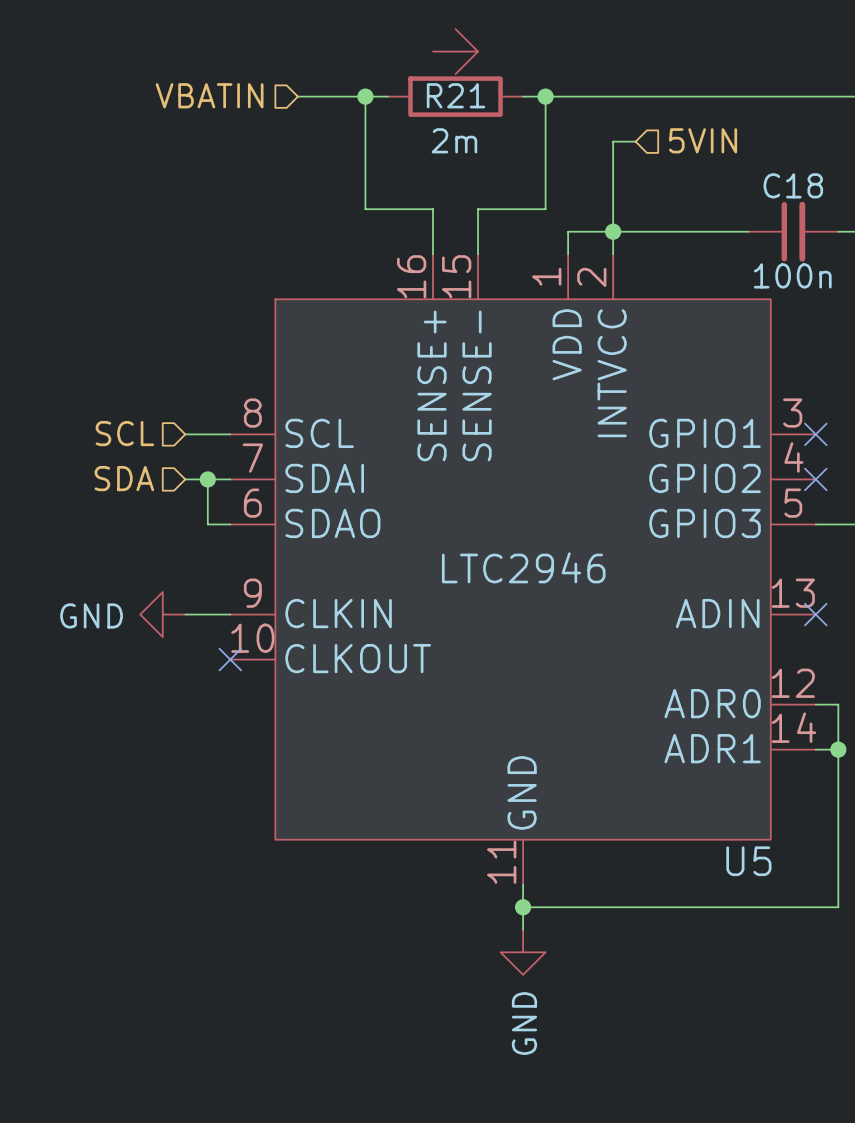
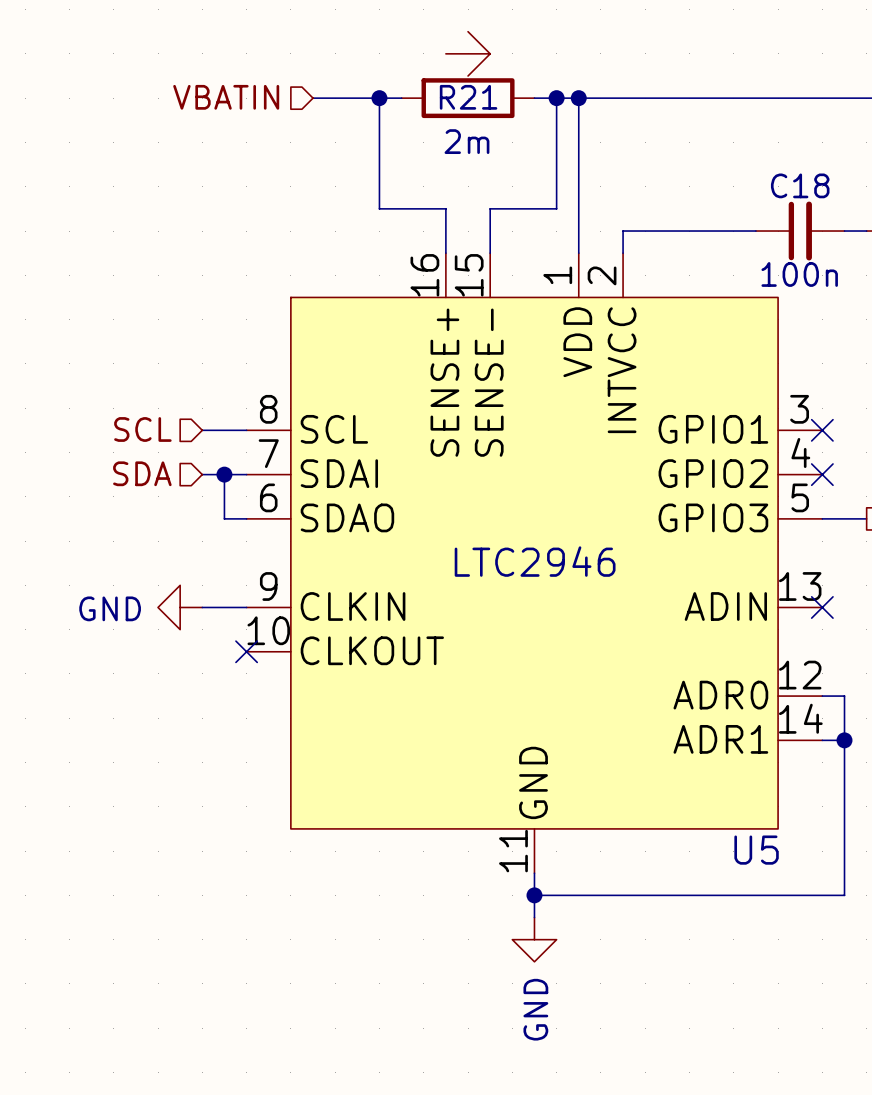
junction: none -> (578, 98)
hierarchical label: 5VIN (703, 140) -> none
wire: (635, 141) (613, 141) (613, 231) (568, 231) -> (578, 98) (578, 231)
junction: (613, 231) -> none

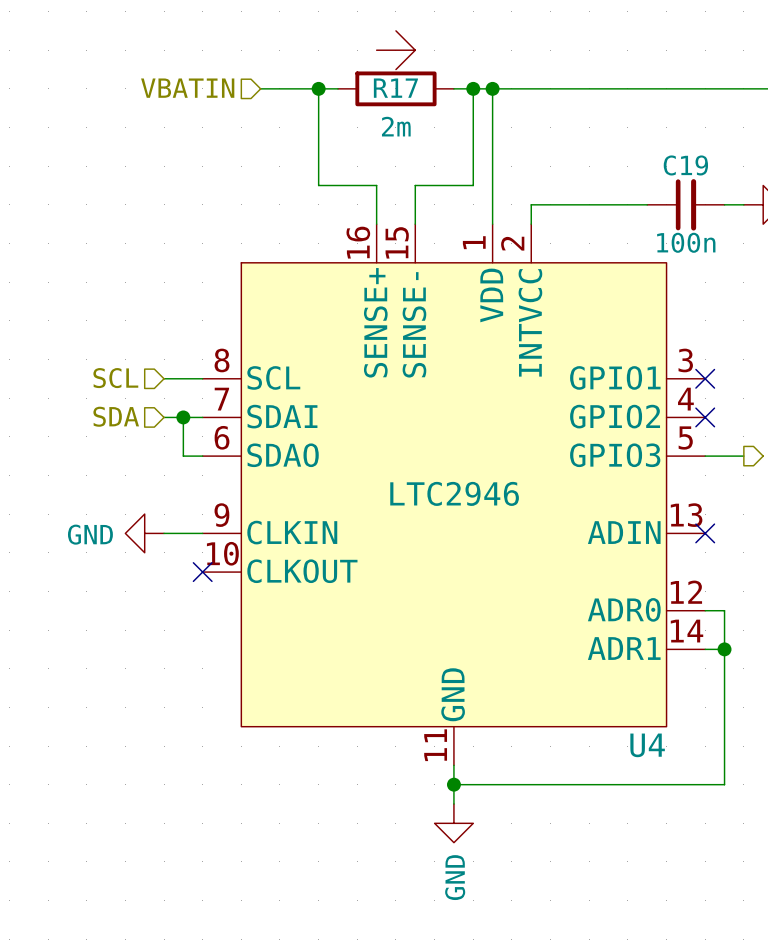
R21 name: R21 (468, 97) -> R17 (395, 88)
C18 name: C18 (800, 185) -> C19 (685, 165)
U5 name: U5 (756, 850) -> U4 (647, 745)

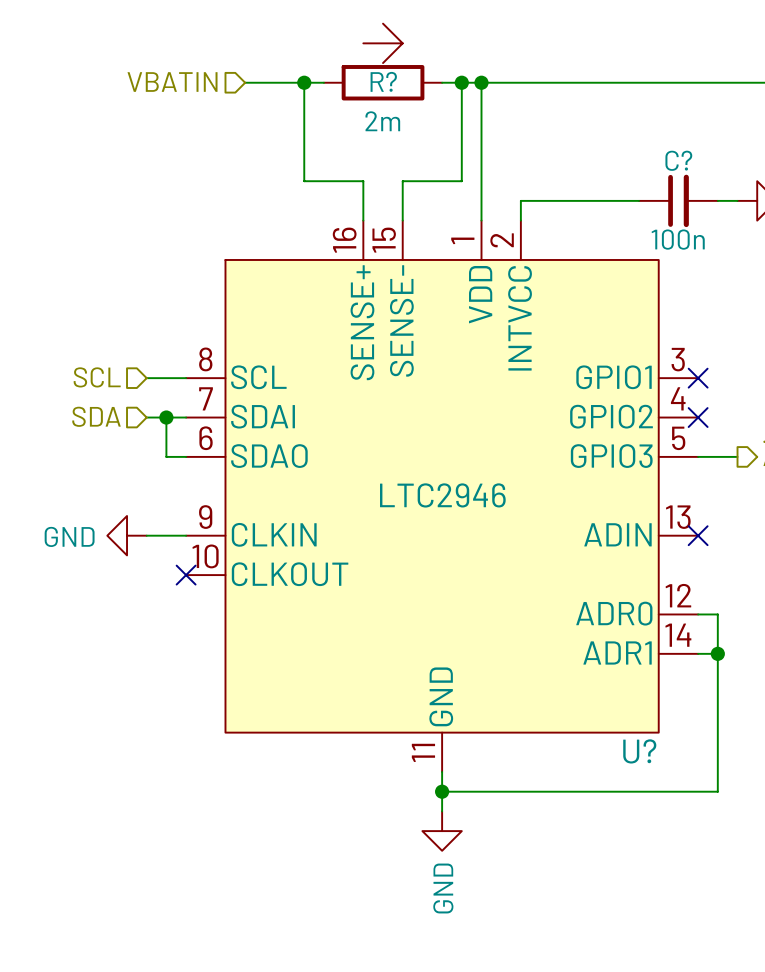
R17 name: R17 (395, 88) -> R? (383, 81)
C19 name: C19 (685, 165) -> C? (678, 160)
U4 name: U4 (647, 745) -> U? (639, 751)

